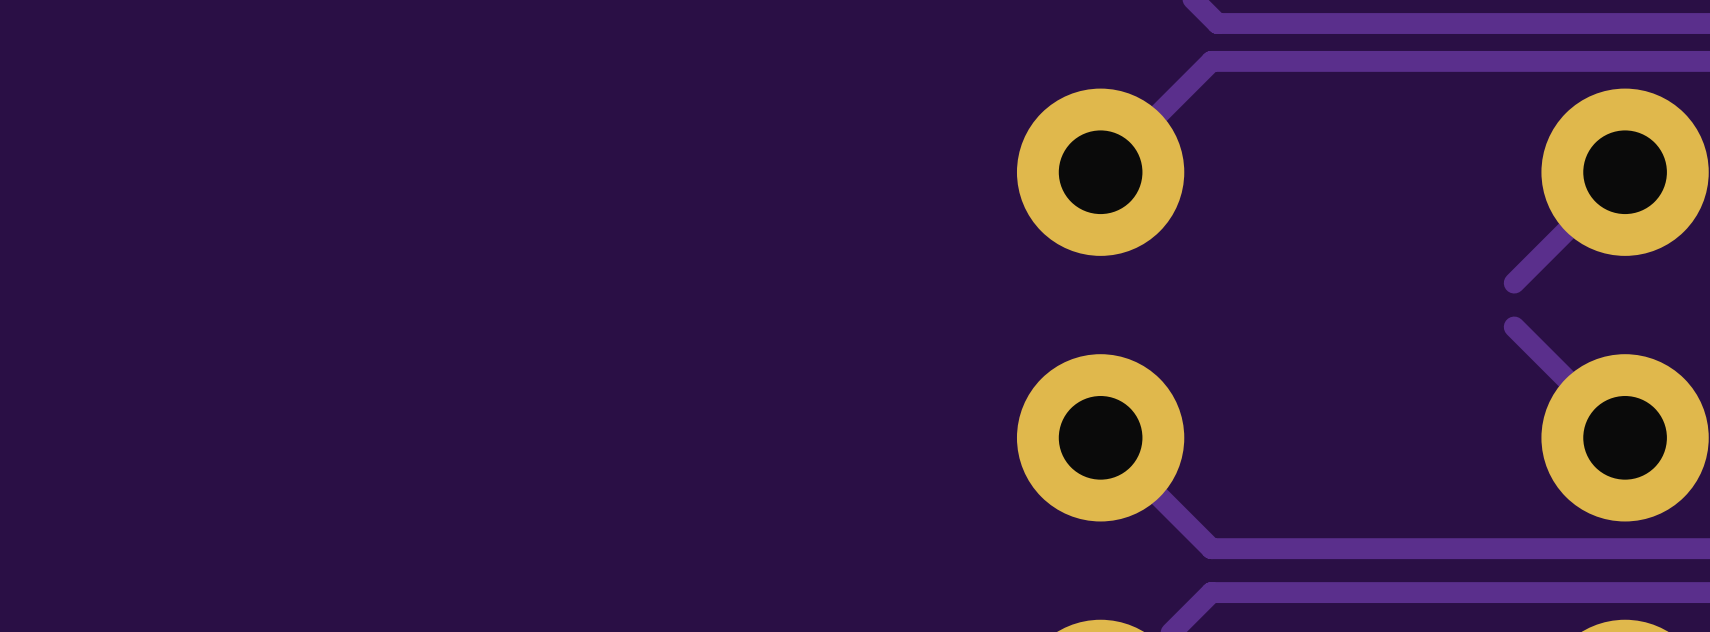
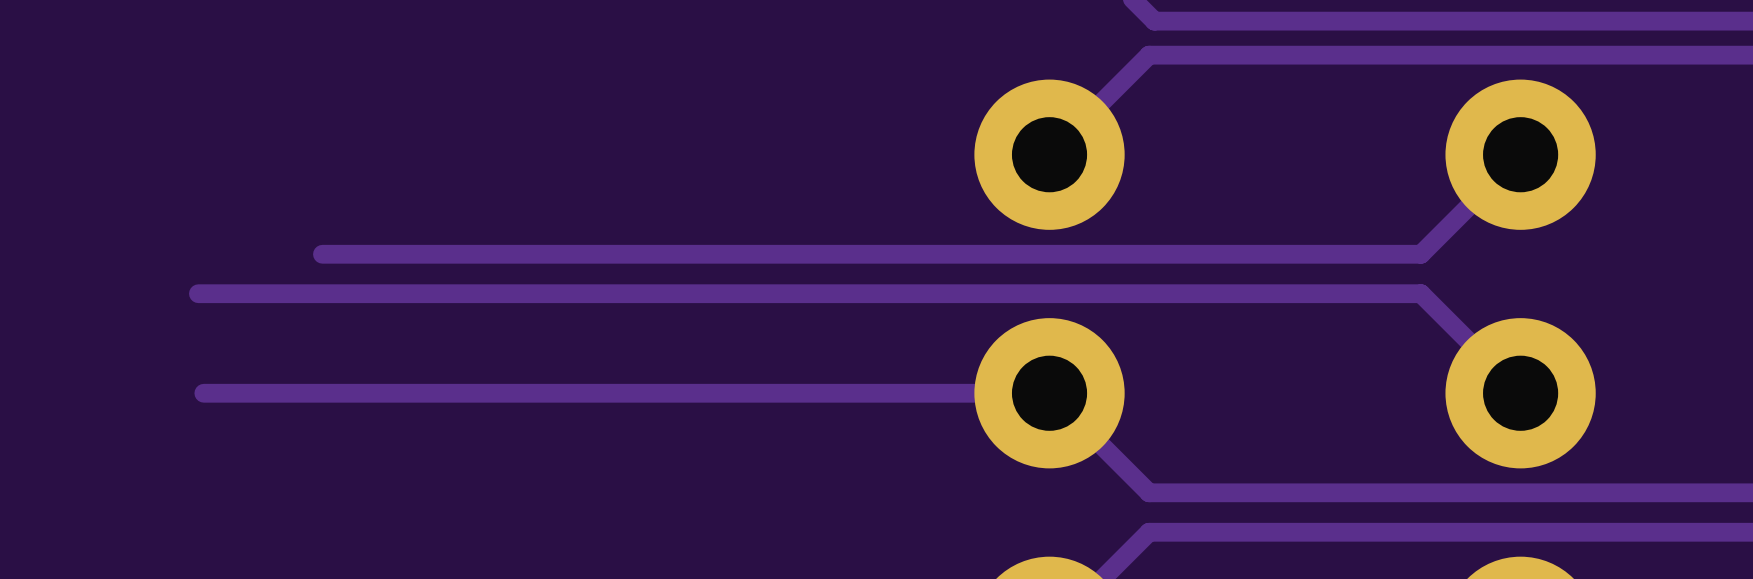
track: none -> (1421, 254) (322, 254)
track: none -> (1421, 293) (198, 293)
track: none -> (1049, 393) (203, 393)

